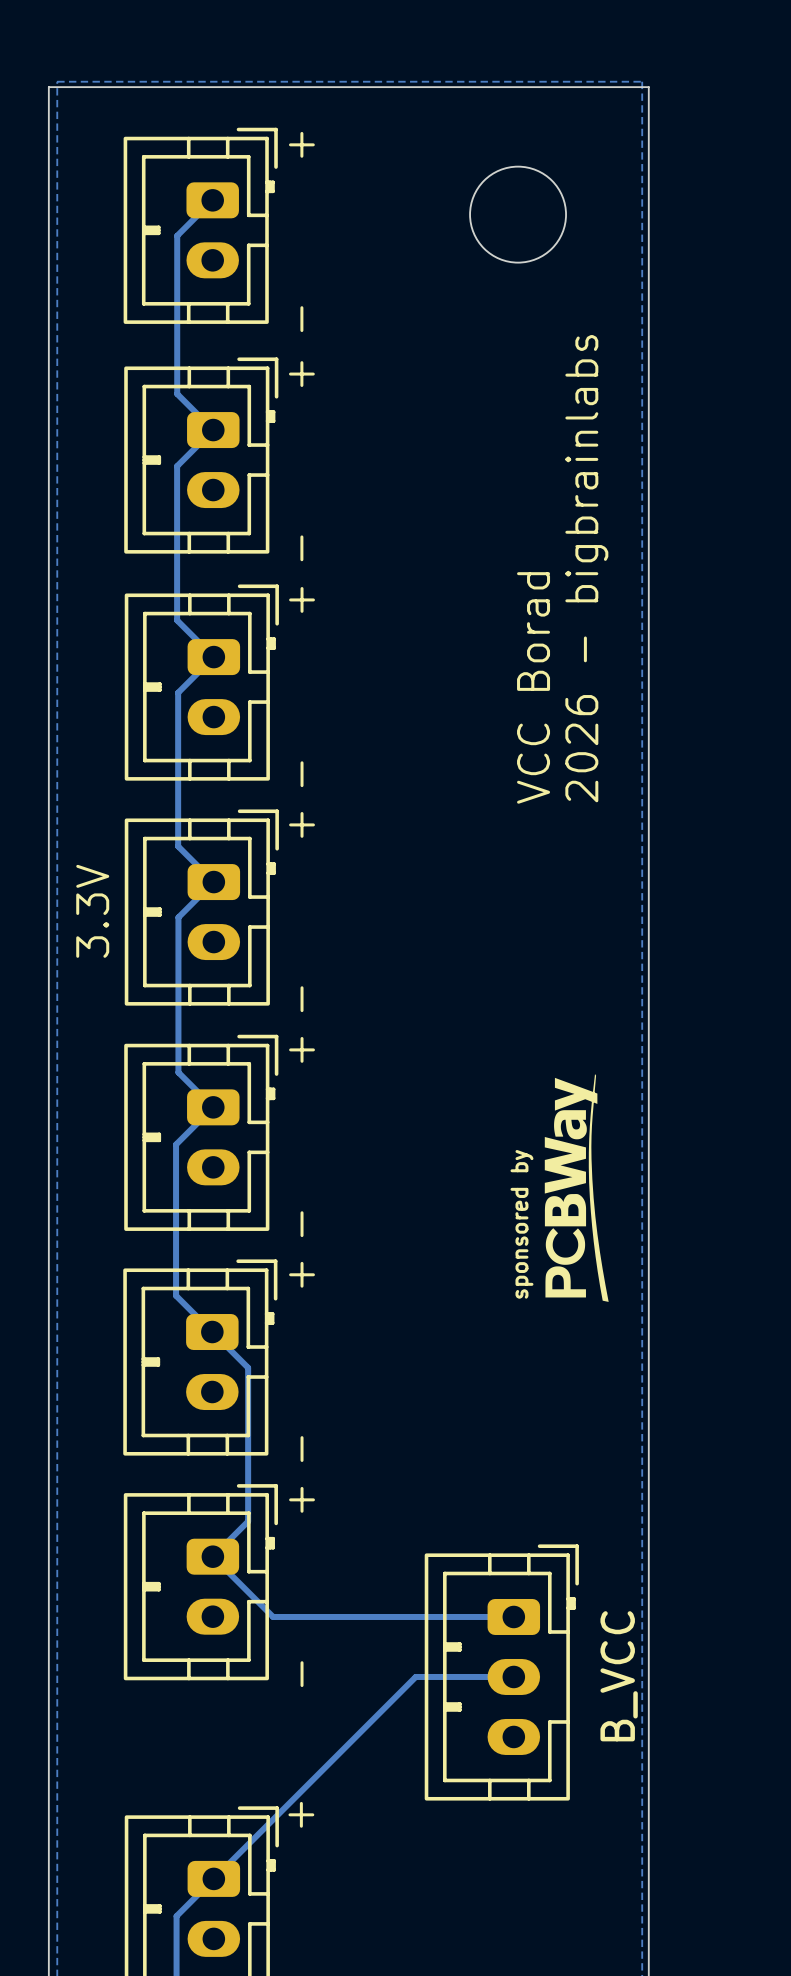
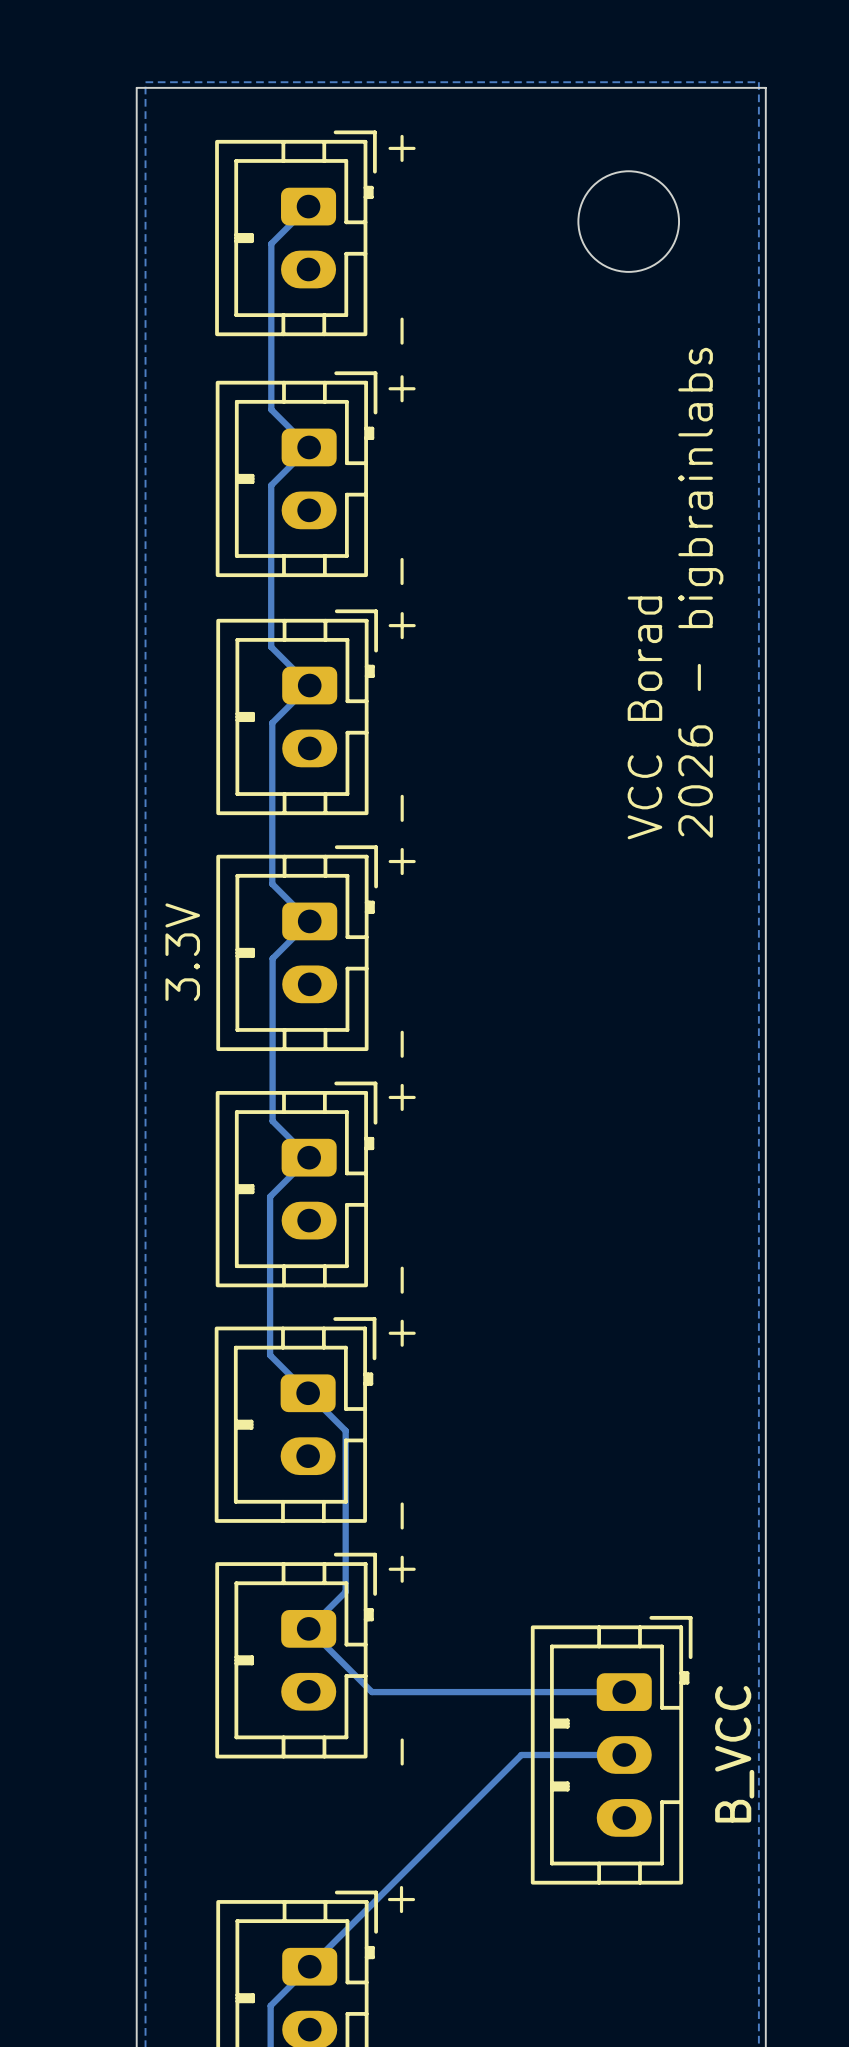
drawing: [544, 1074, 609, 1302] -> none
text: sponsored by (521, 1224) -> none

